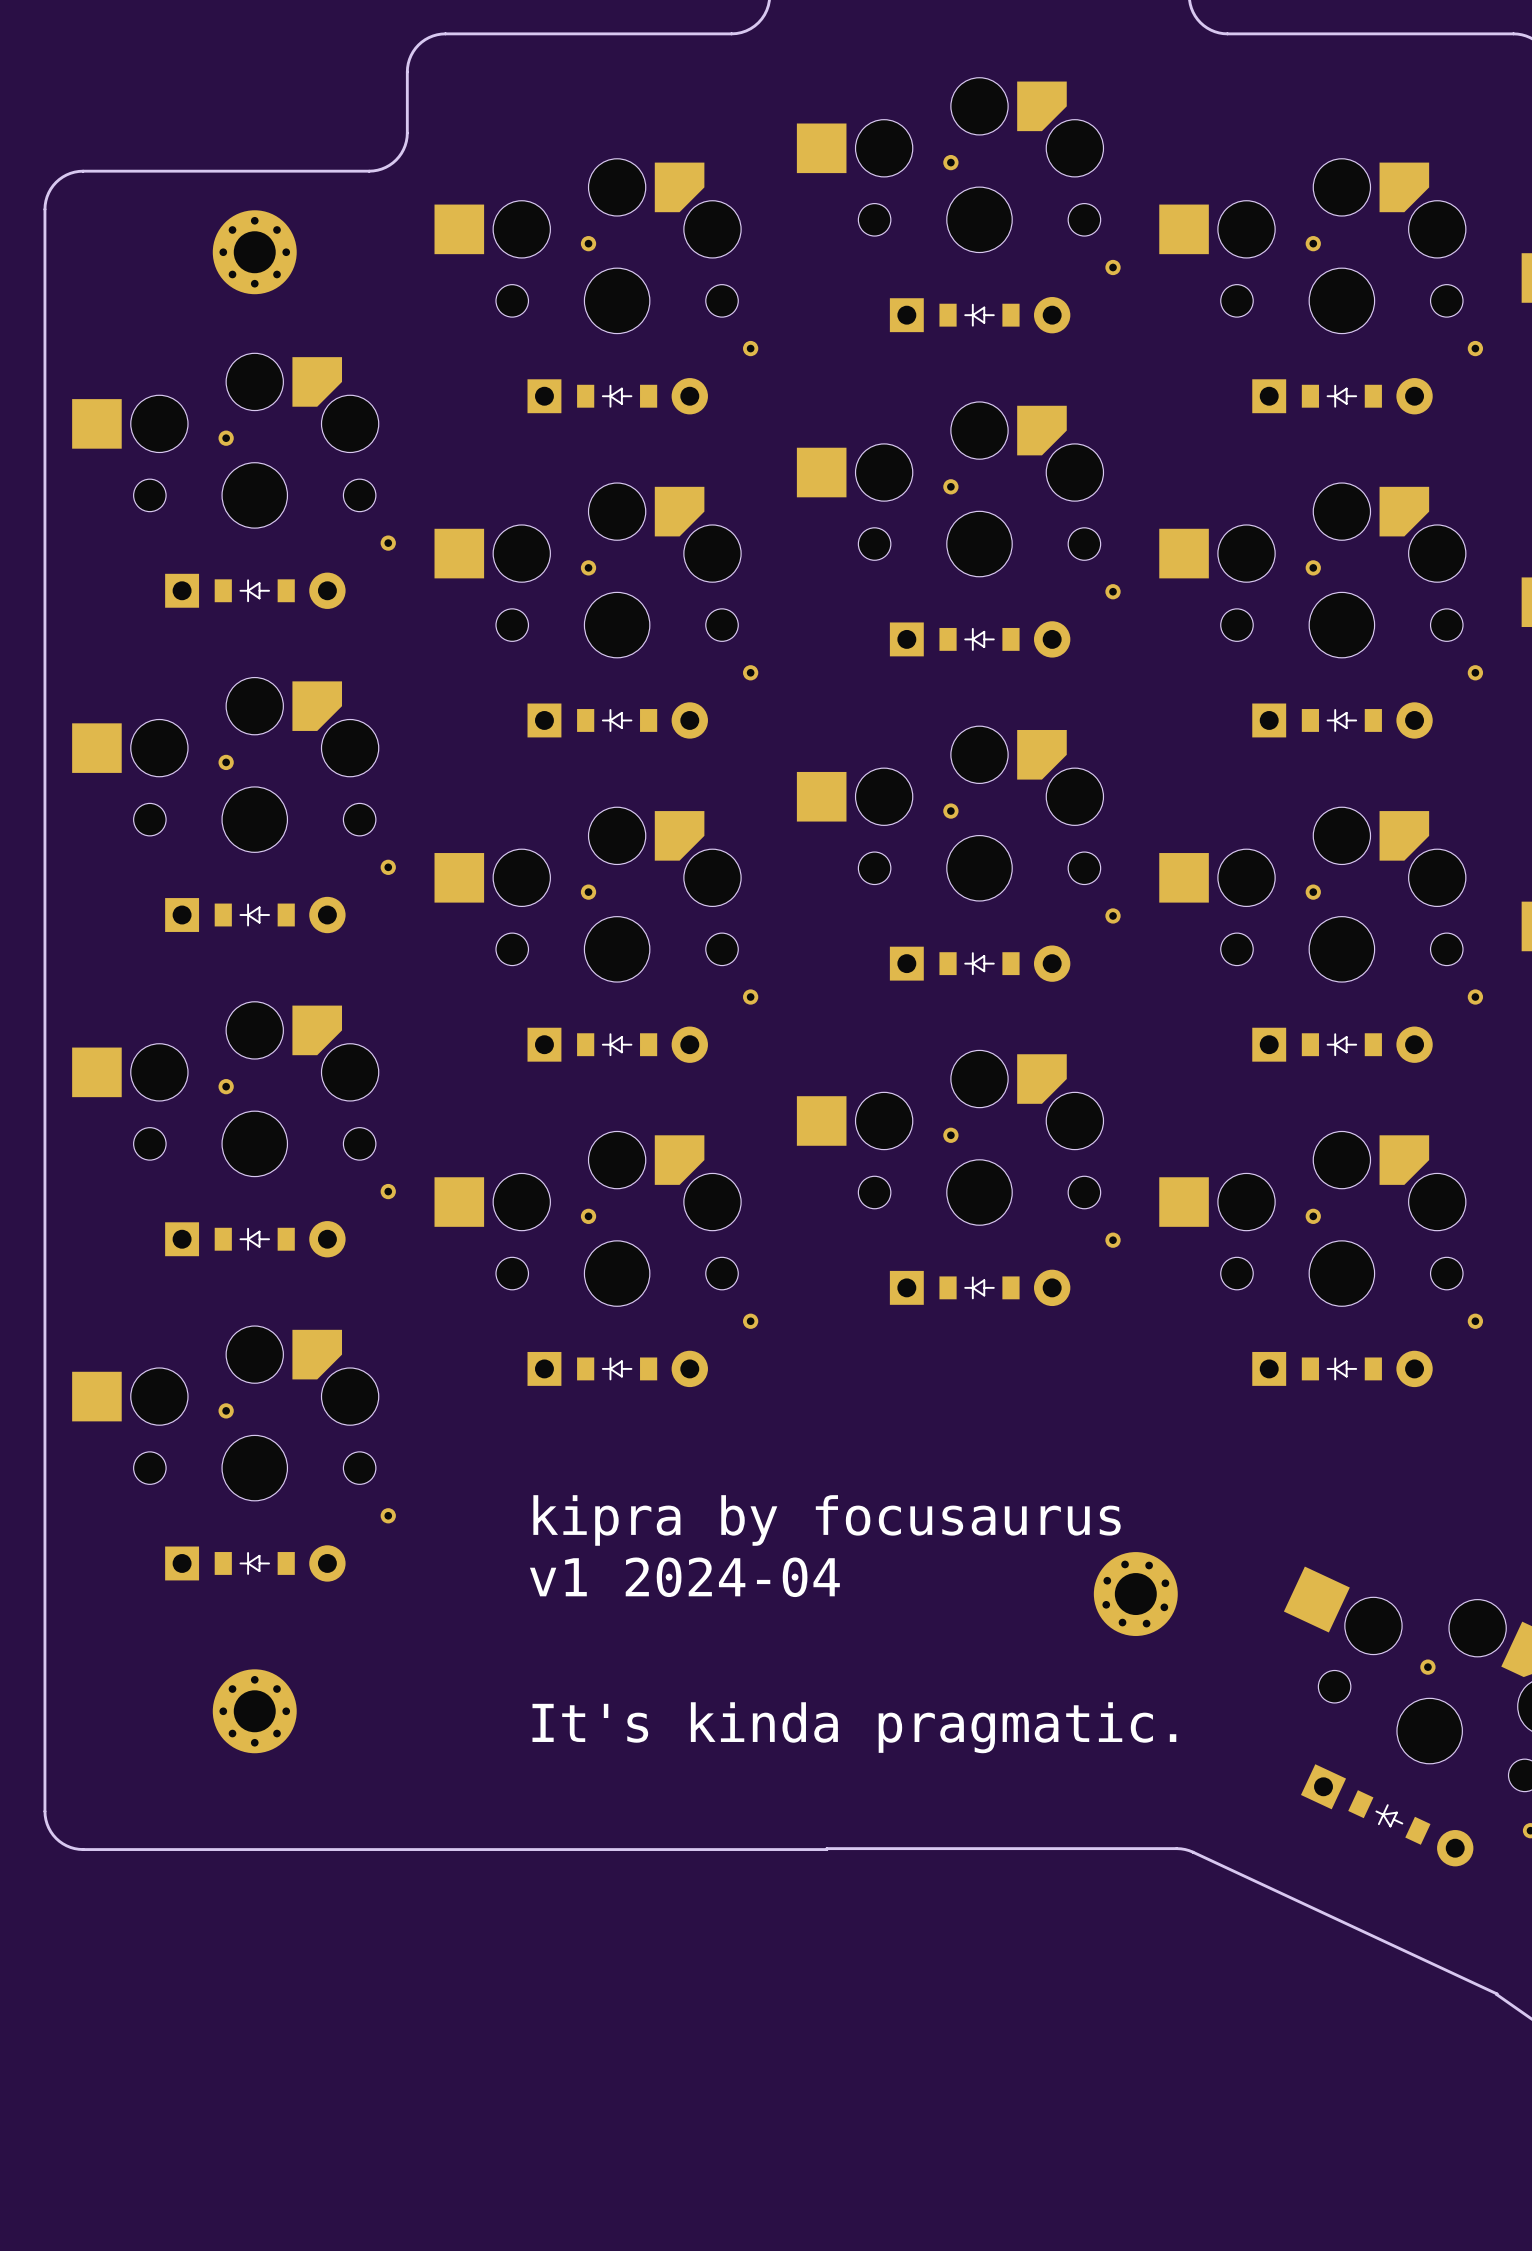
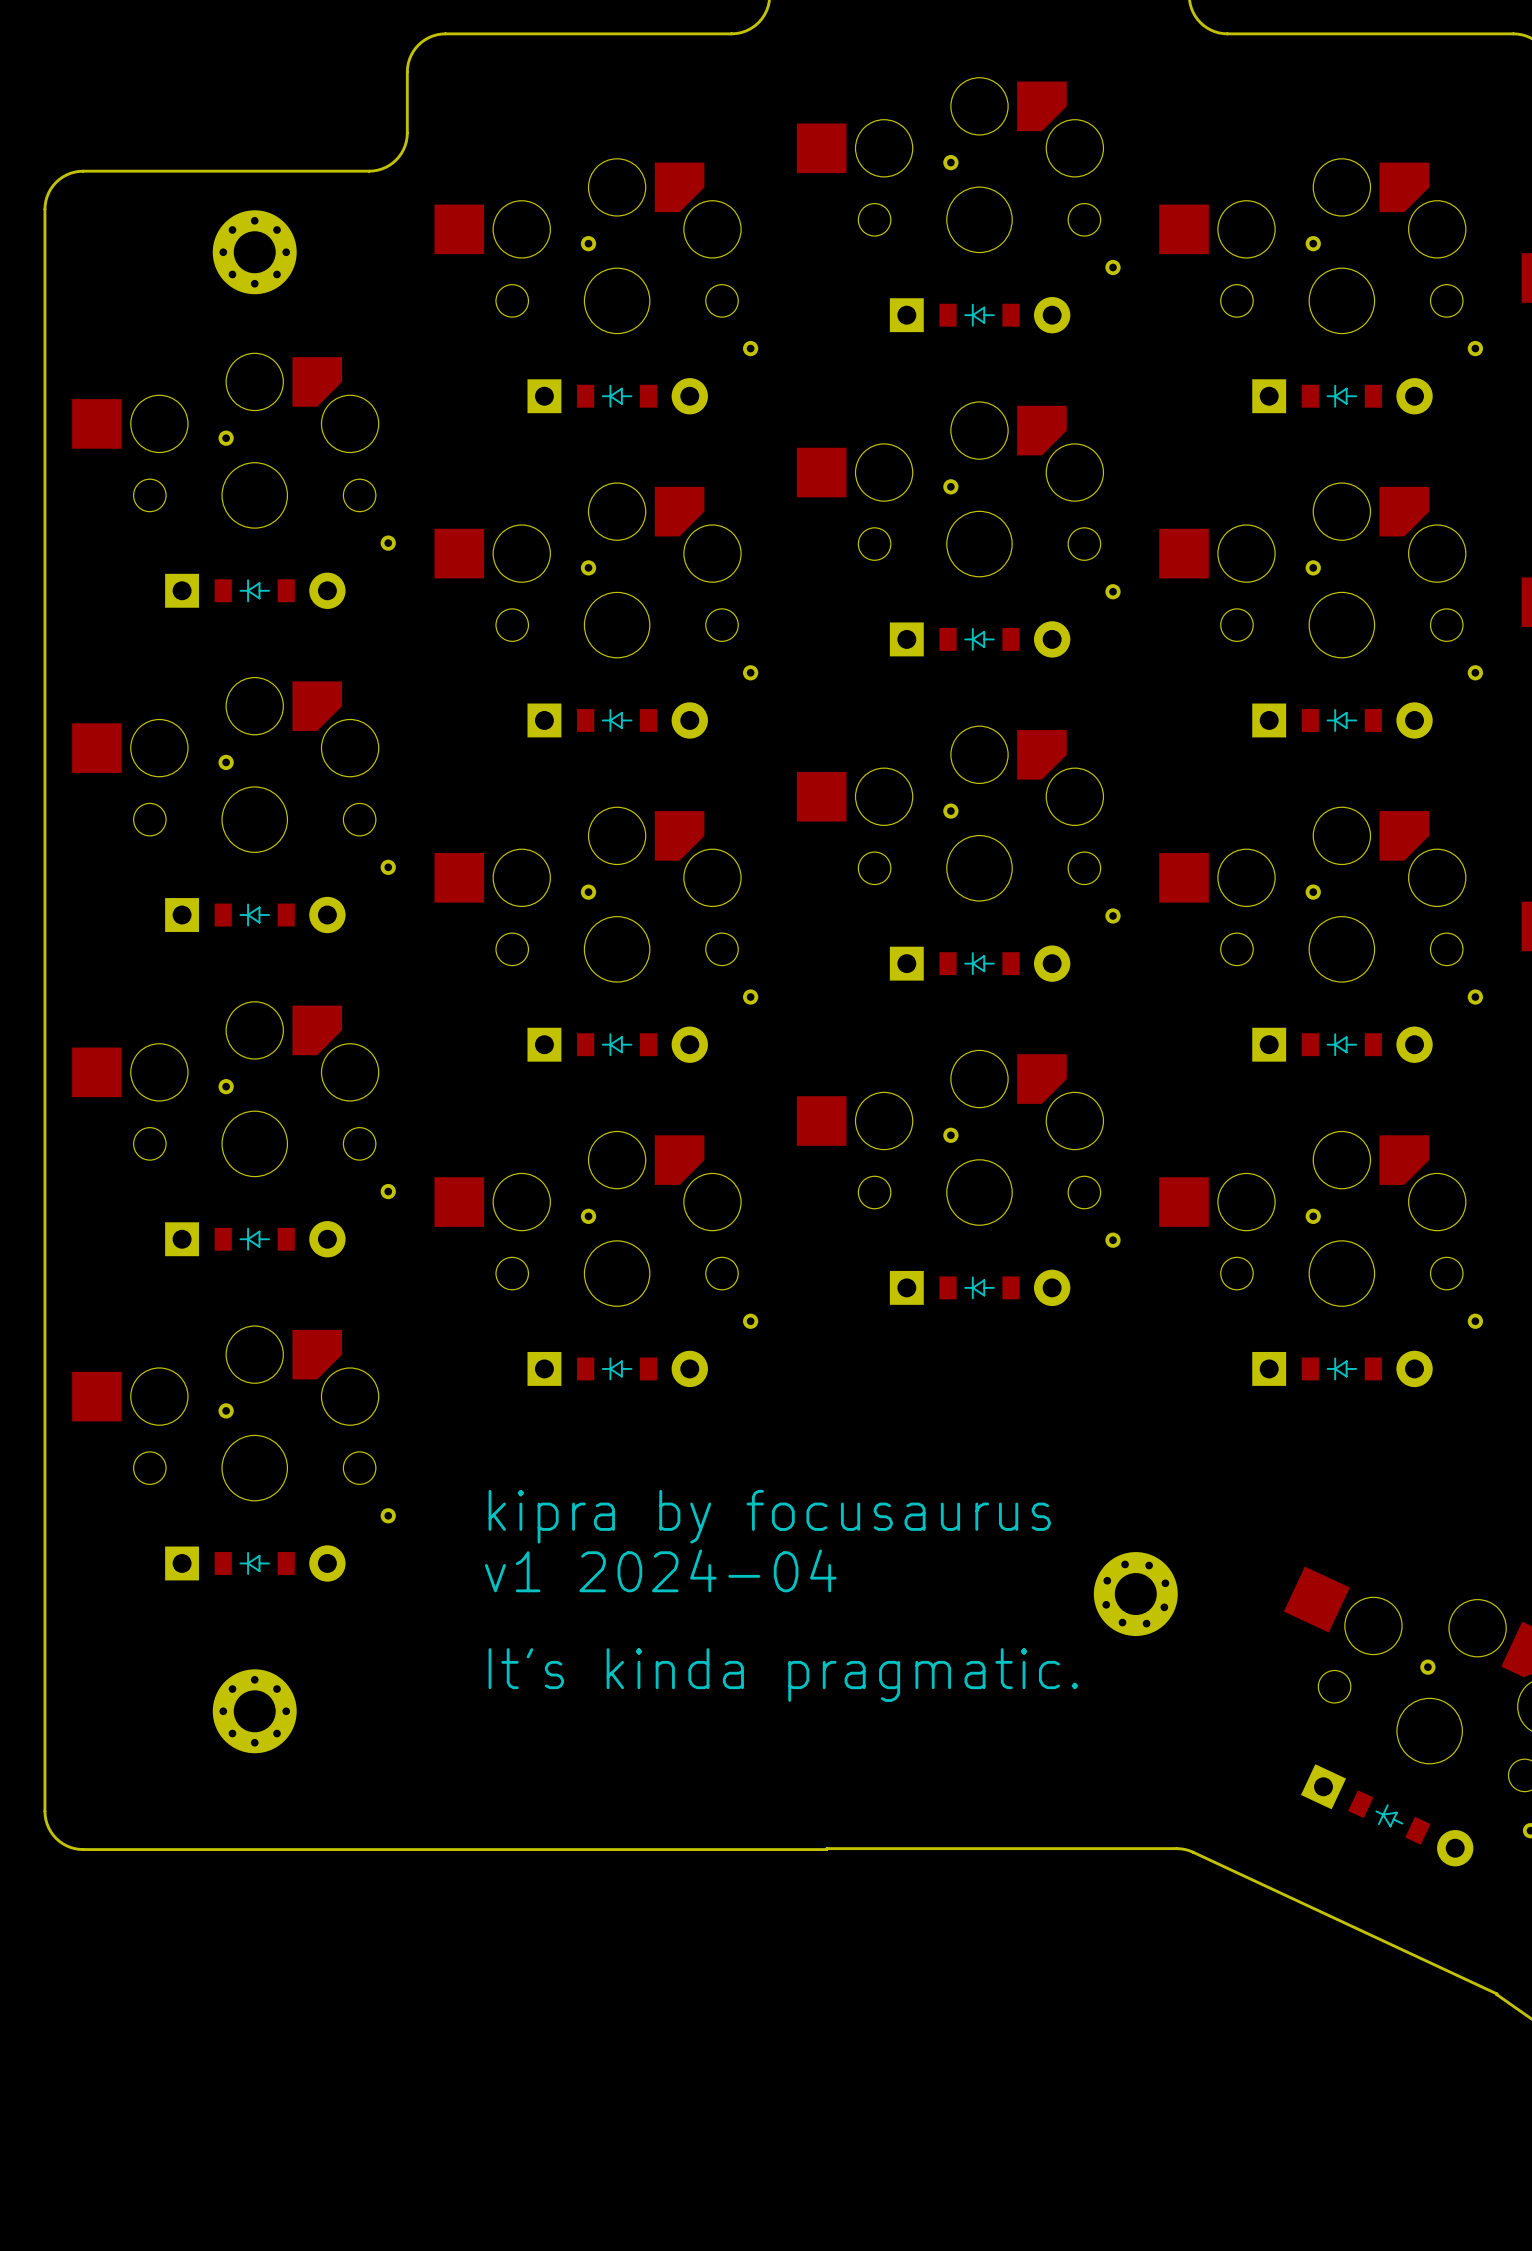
text position: kipra by focusaurus (827, 1520) -> kipra by focusaurus (769, 1516)
text position: v1 2024-04 (684, 1577) -> v1 2024-04 (660, 1570)
text position: It's kinda pragmatic. (854, 1727) -> It's kinda pragmatic. (783, 1675)

